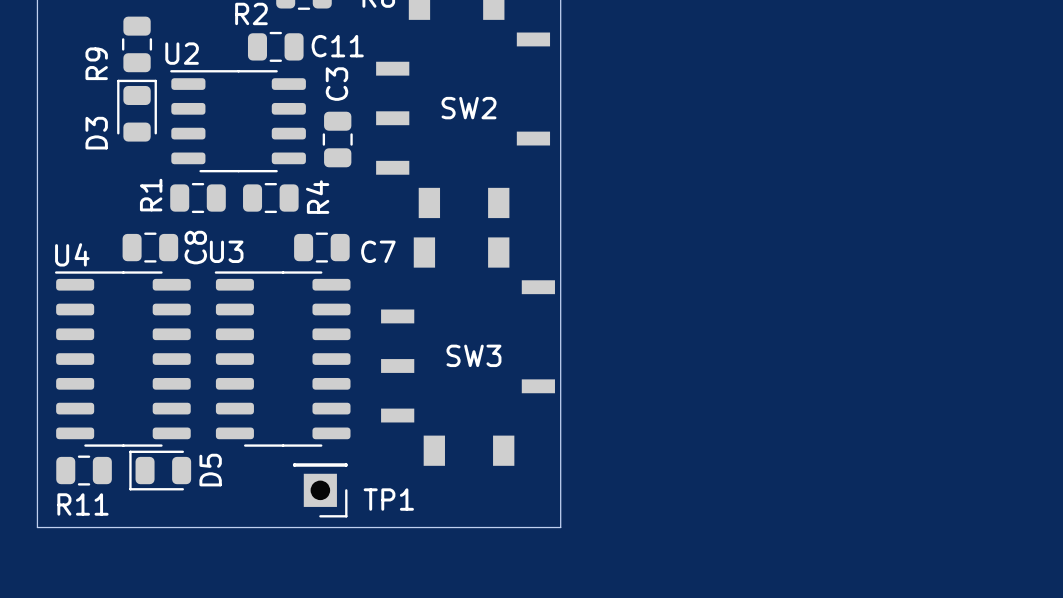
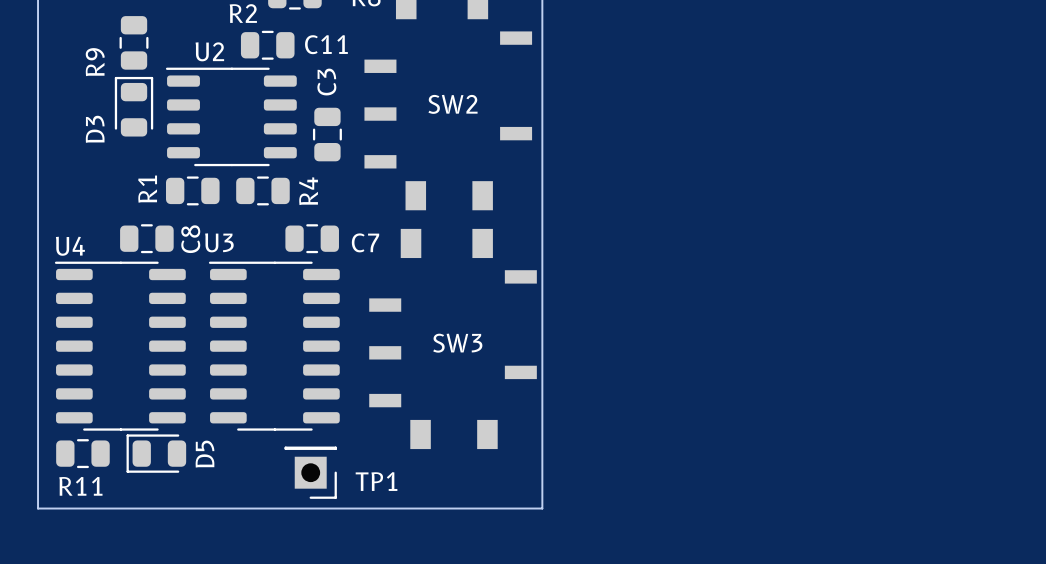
U2 name position: U2 (182, 53) -> U2 (209, 51)

